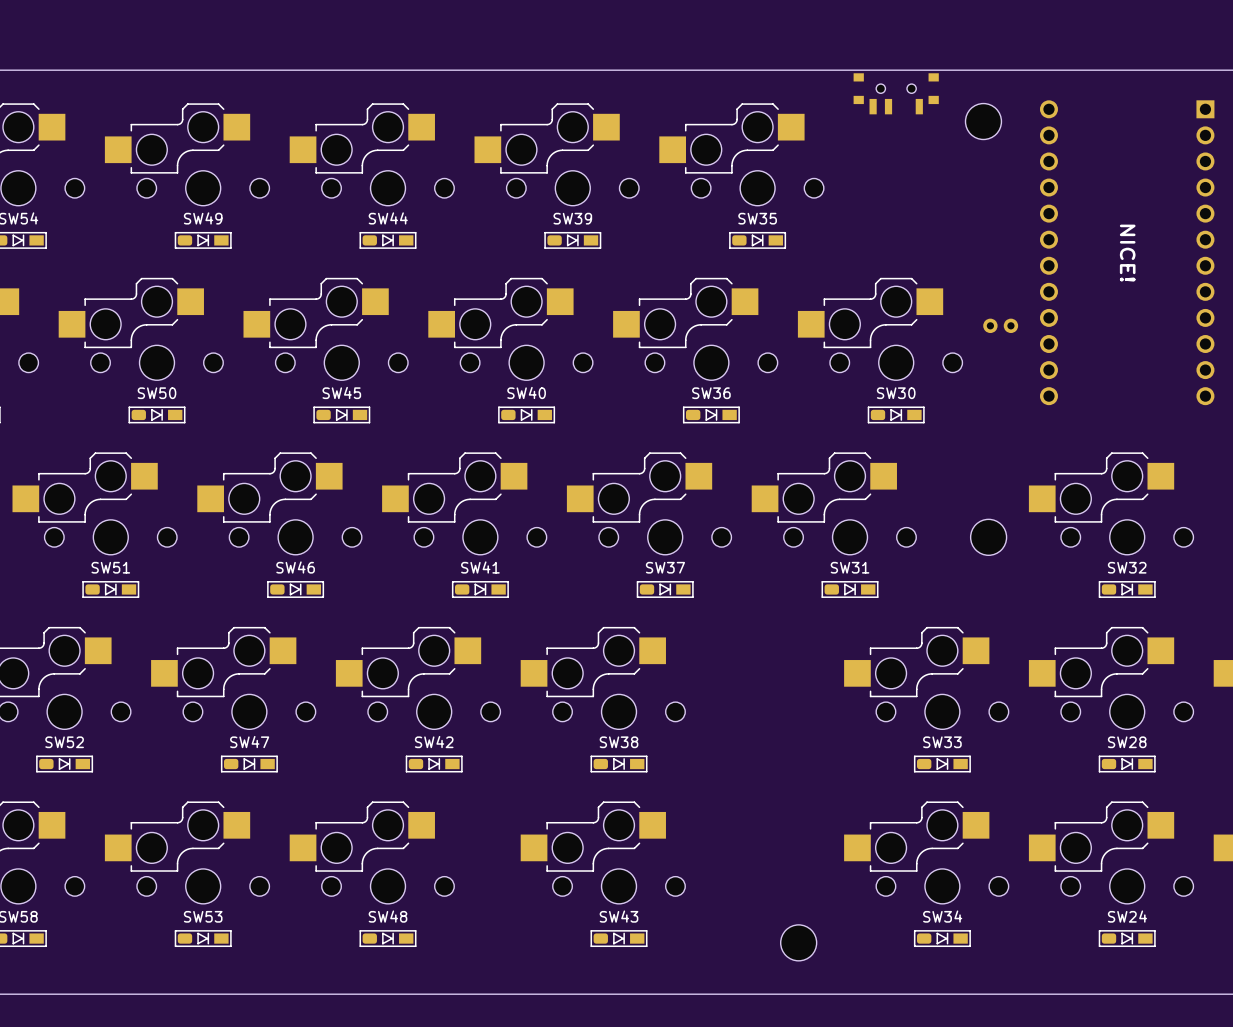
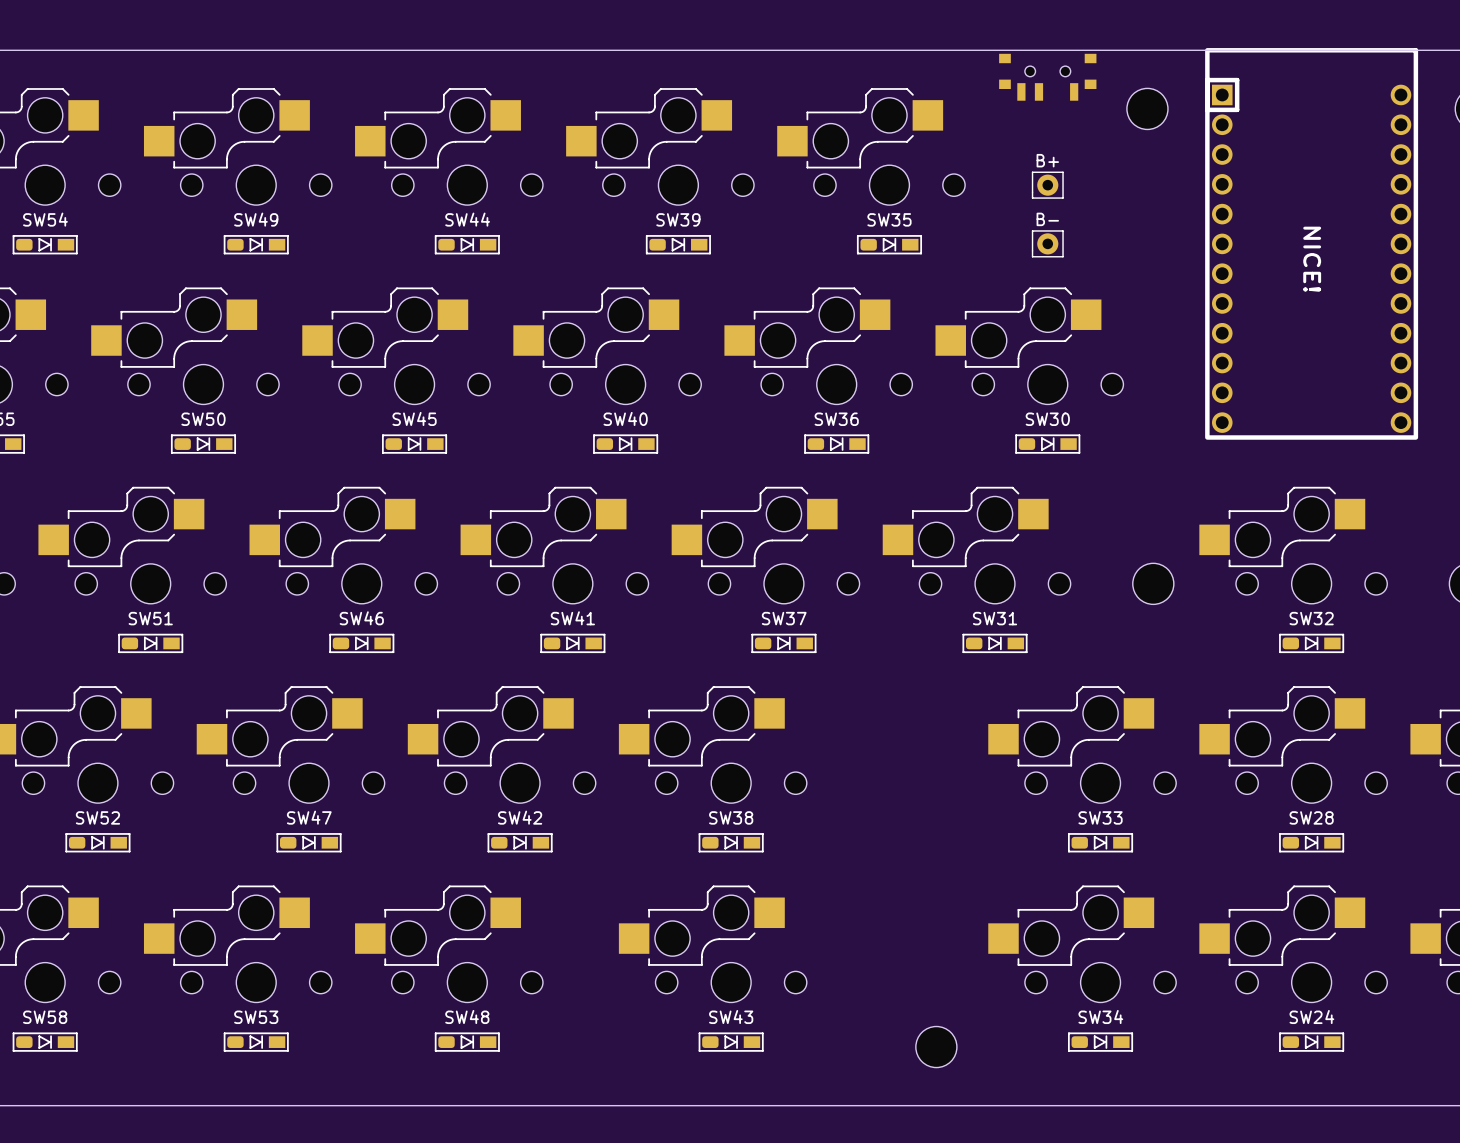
part: none -> B+ (1047, 185)
part: none -> B- (1047, 243)
part side: top (1127, 252) -> bottom (1311, 243)
part: (1000, 325) -> none

